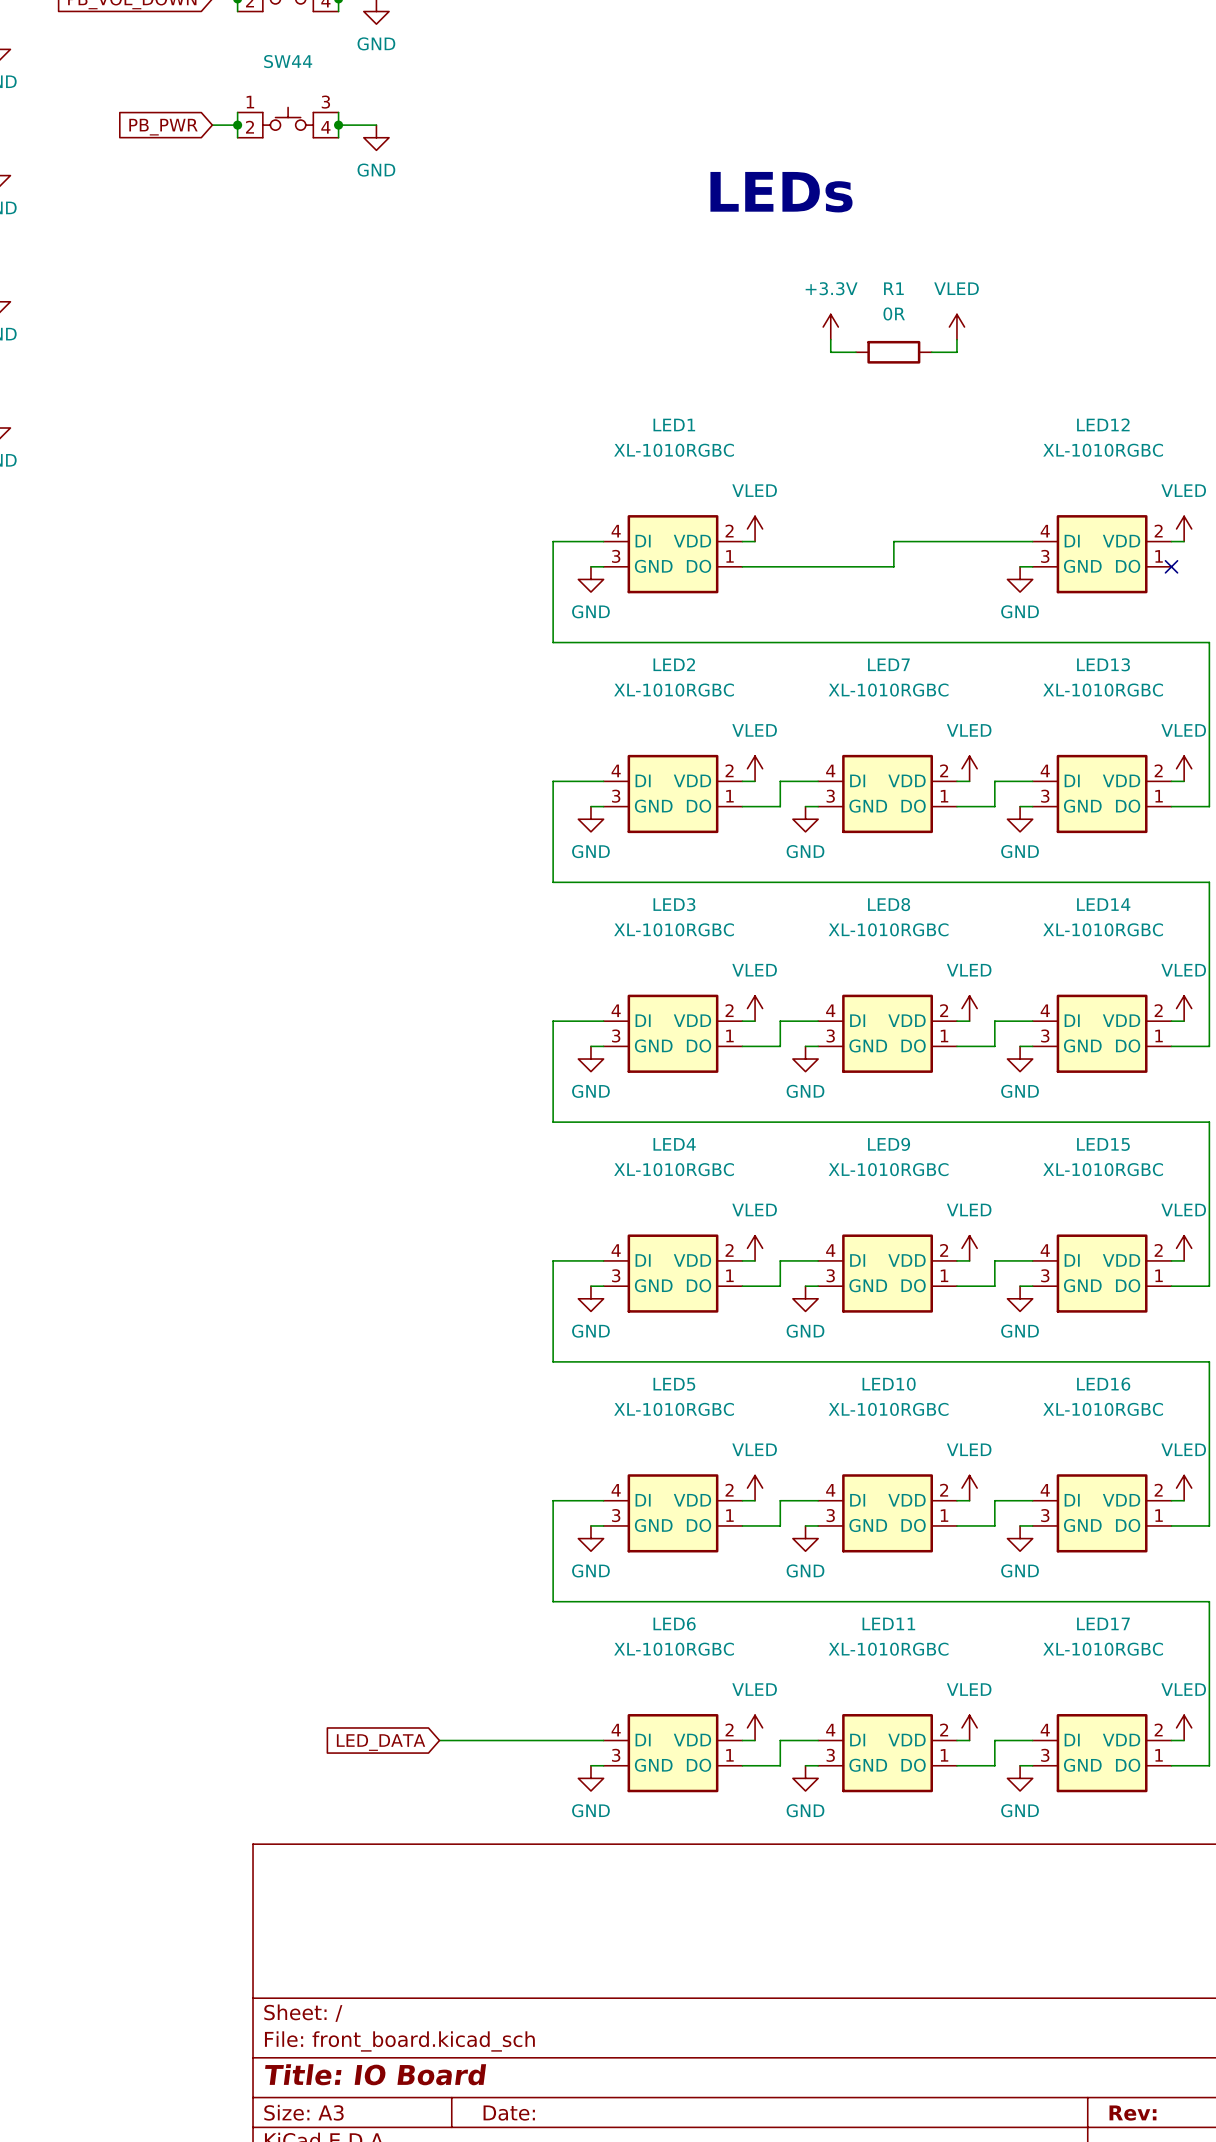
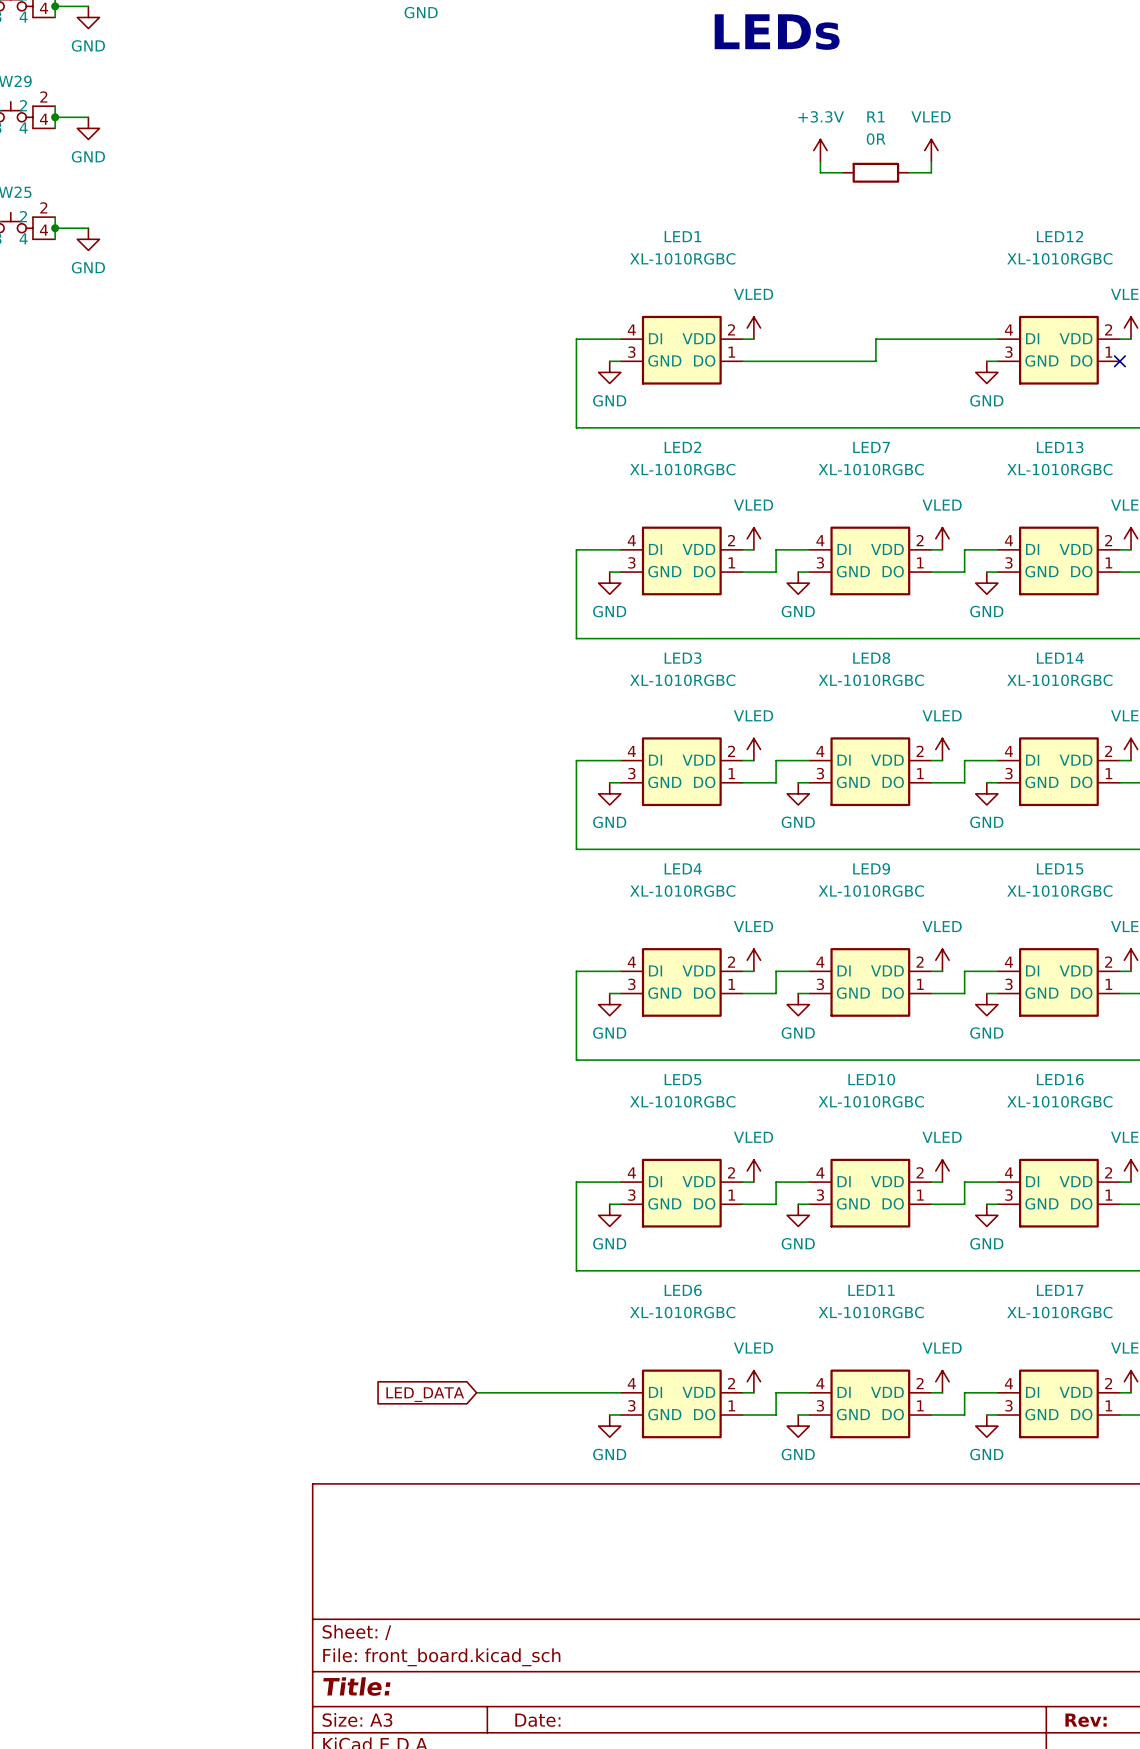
title block: Title: IO Board (375, 2074) -> Title: (356, 1686)

